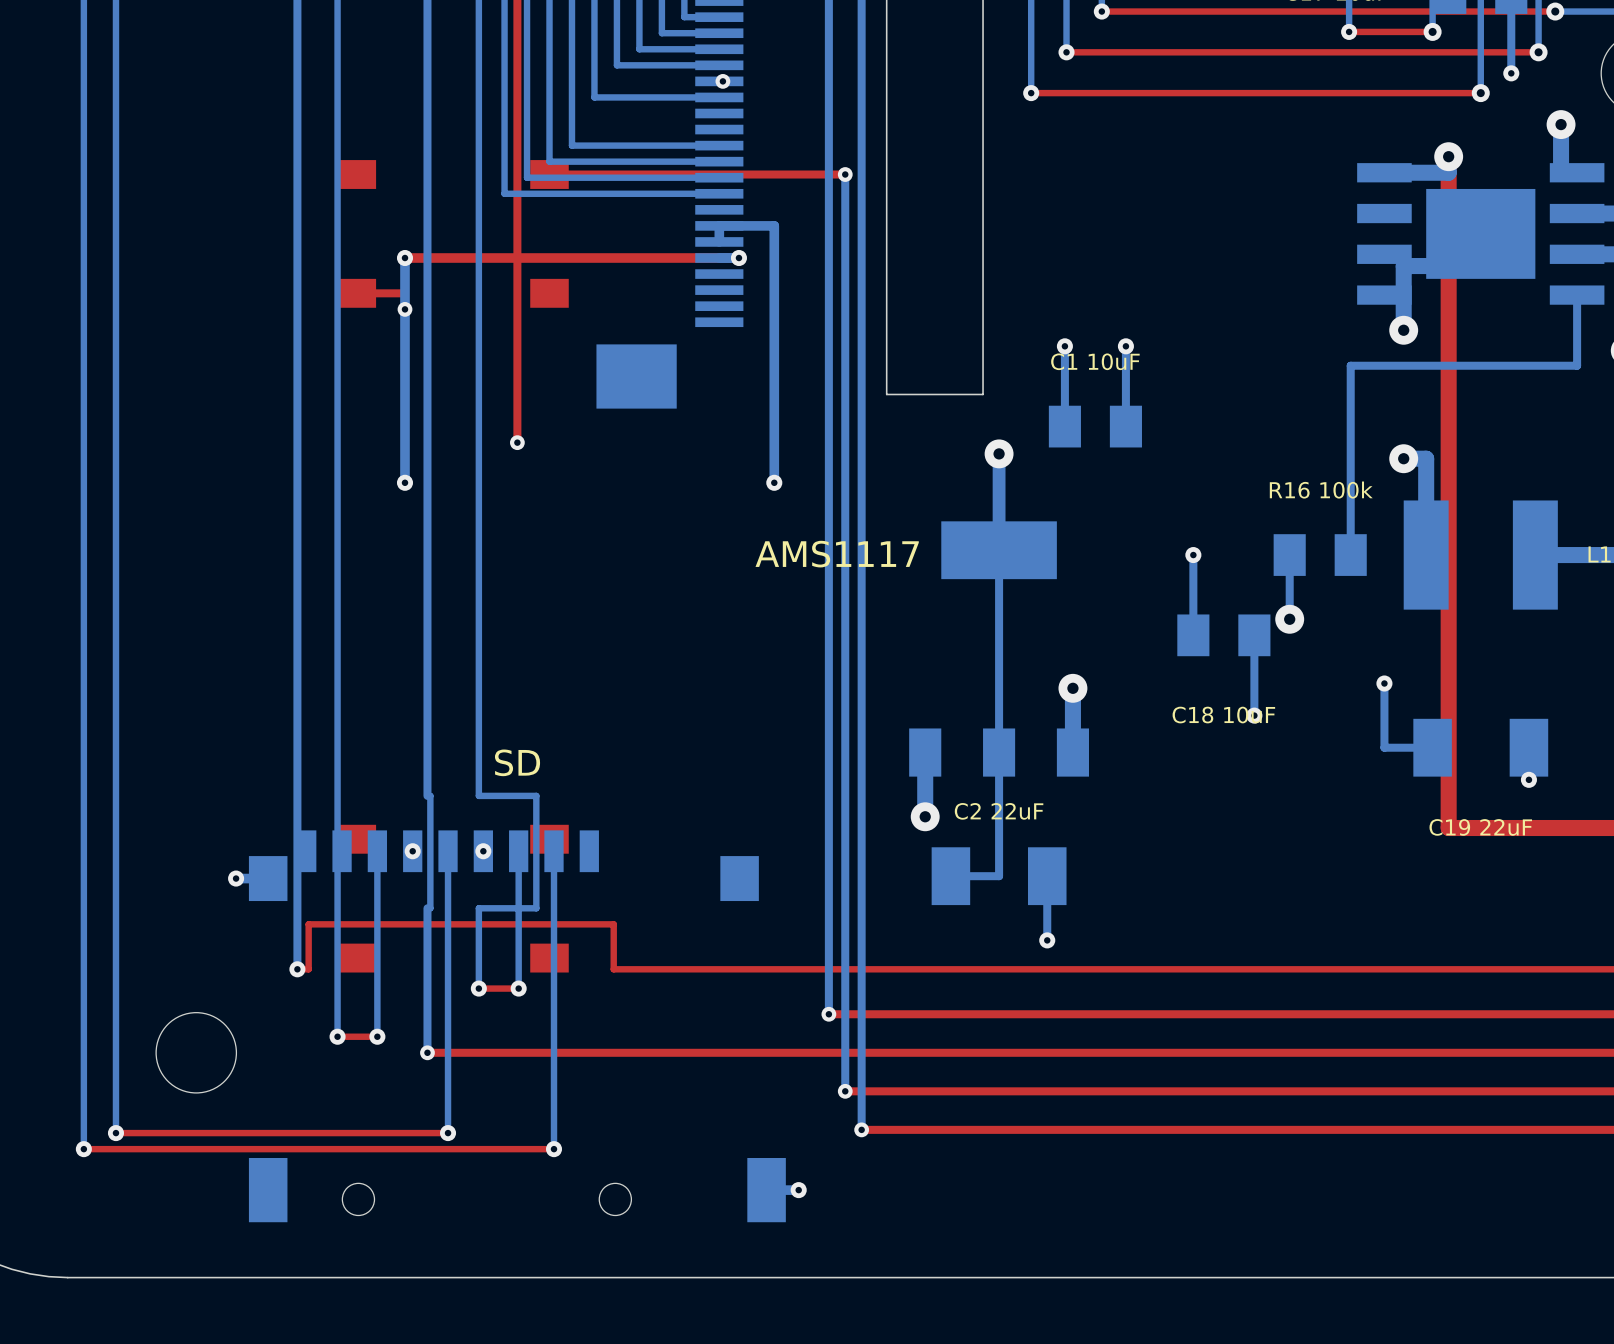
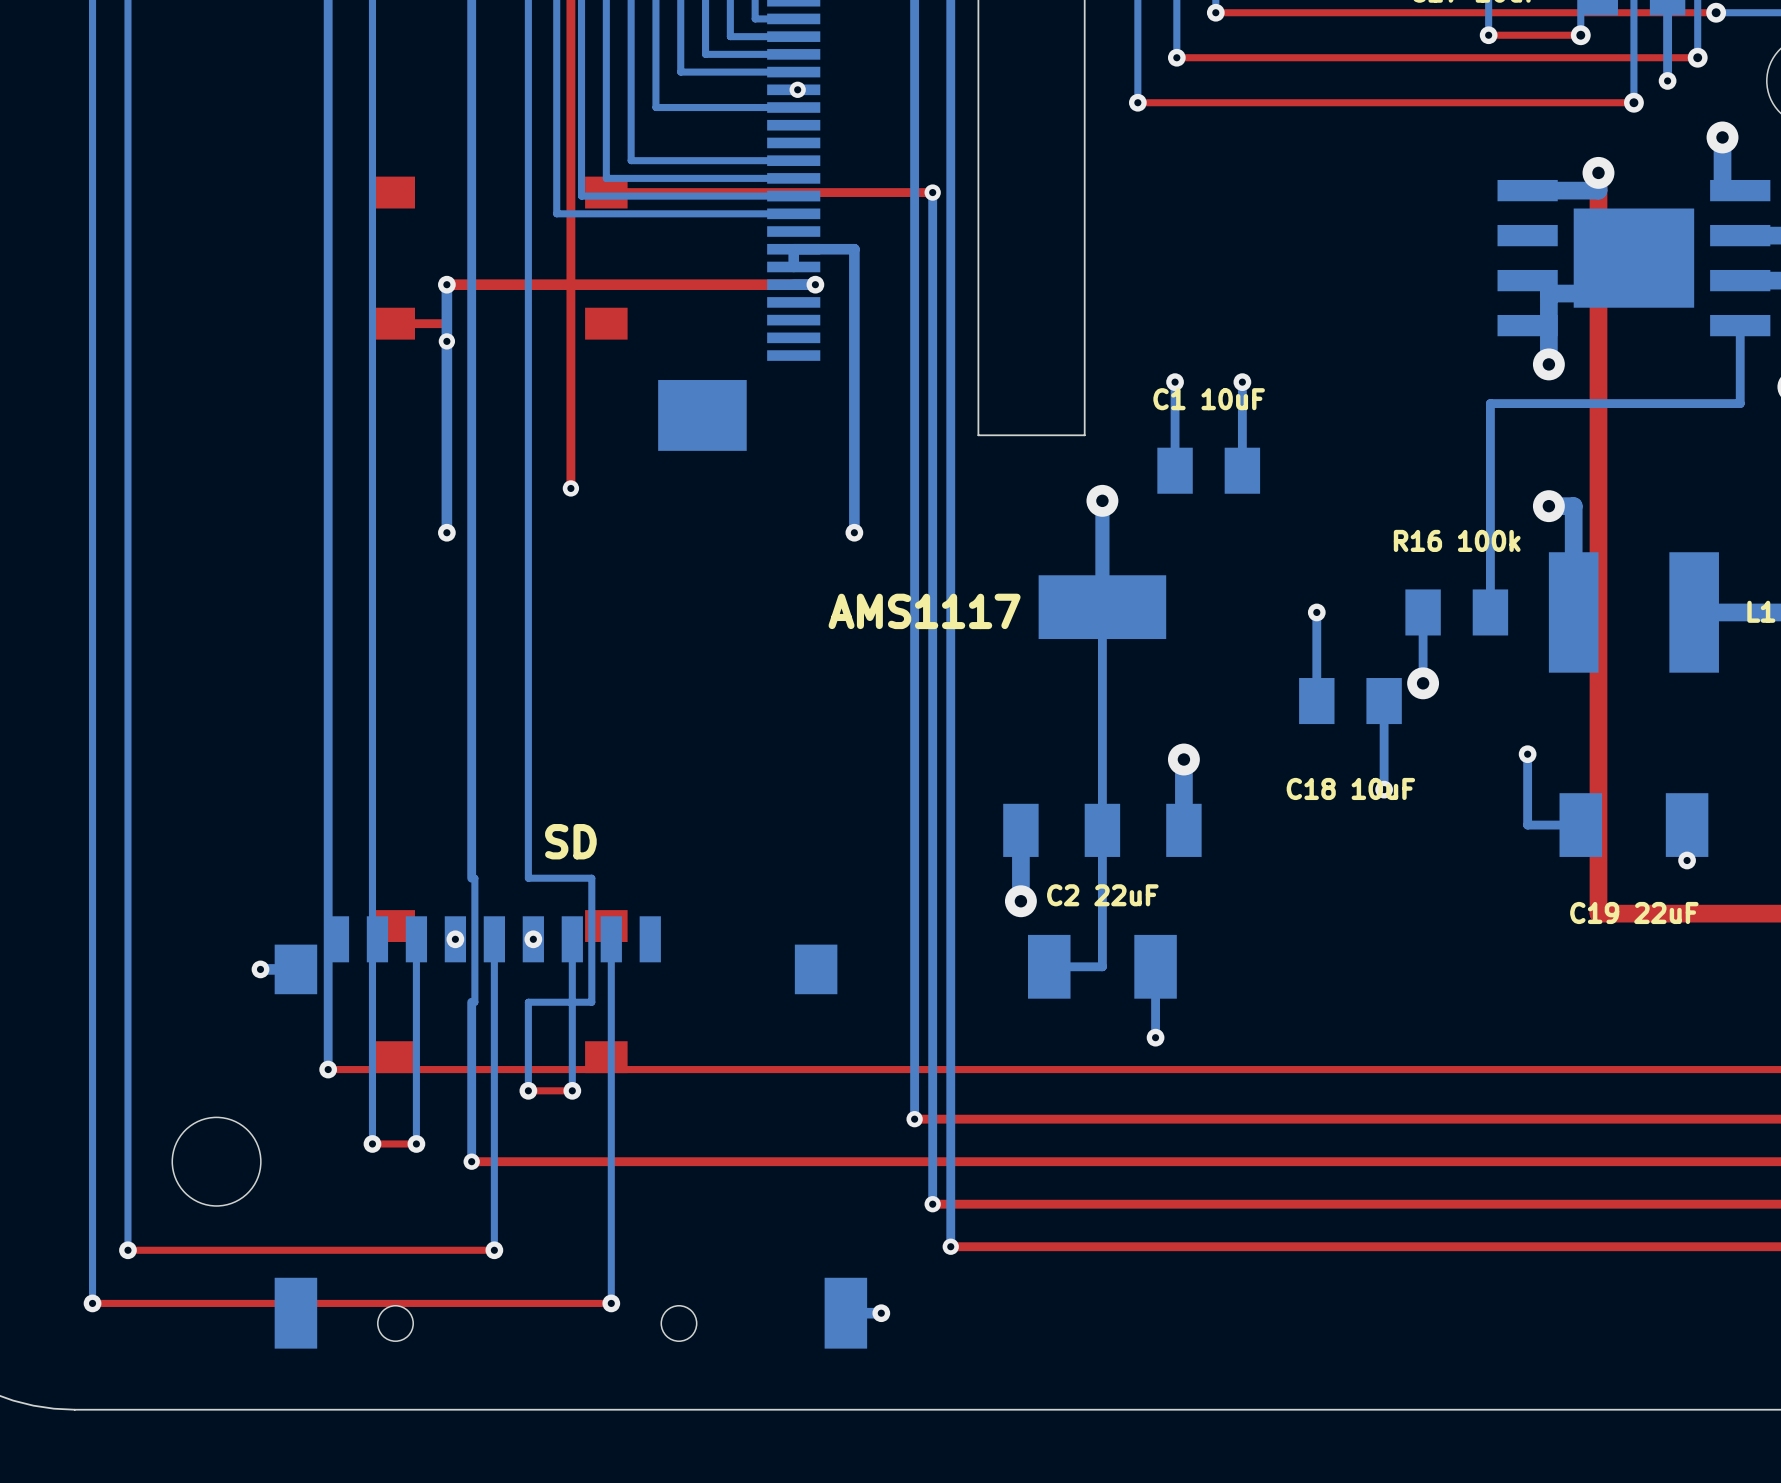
top track: (613, 969) (613, 924) (308, 924) (308, 969) -> (677, 1069) (340, 1069)
bottom track: none -> (92, 1267) (92, 1303)
via position: (83, 1149) -> (92, 1303)
top track: (554, 1149) (83, 1149) -> (611, 1303) (92, 1303)
bottom track: none -> (611, 1267) (611, 1303)
via position: (554, 1149) -> (611, 1303)

